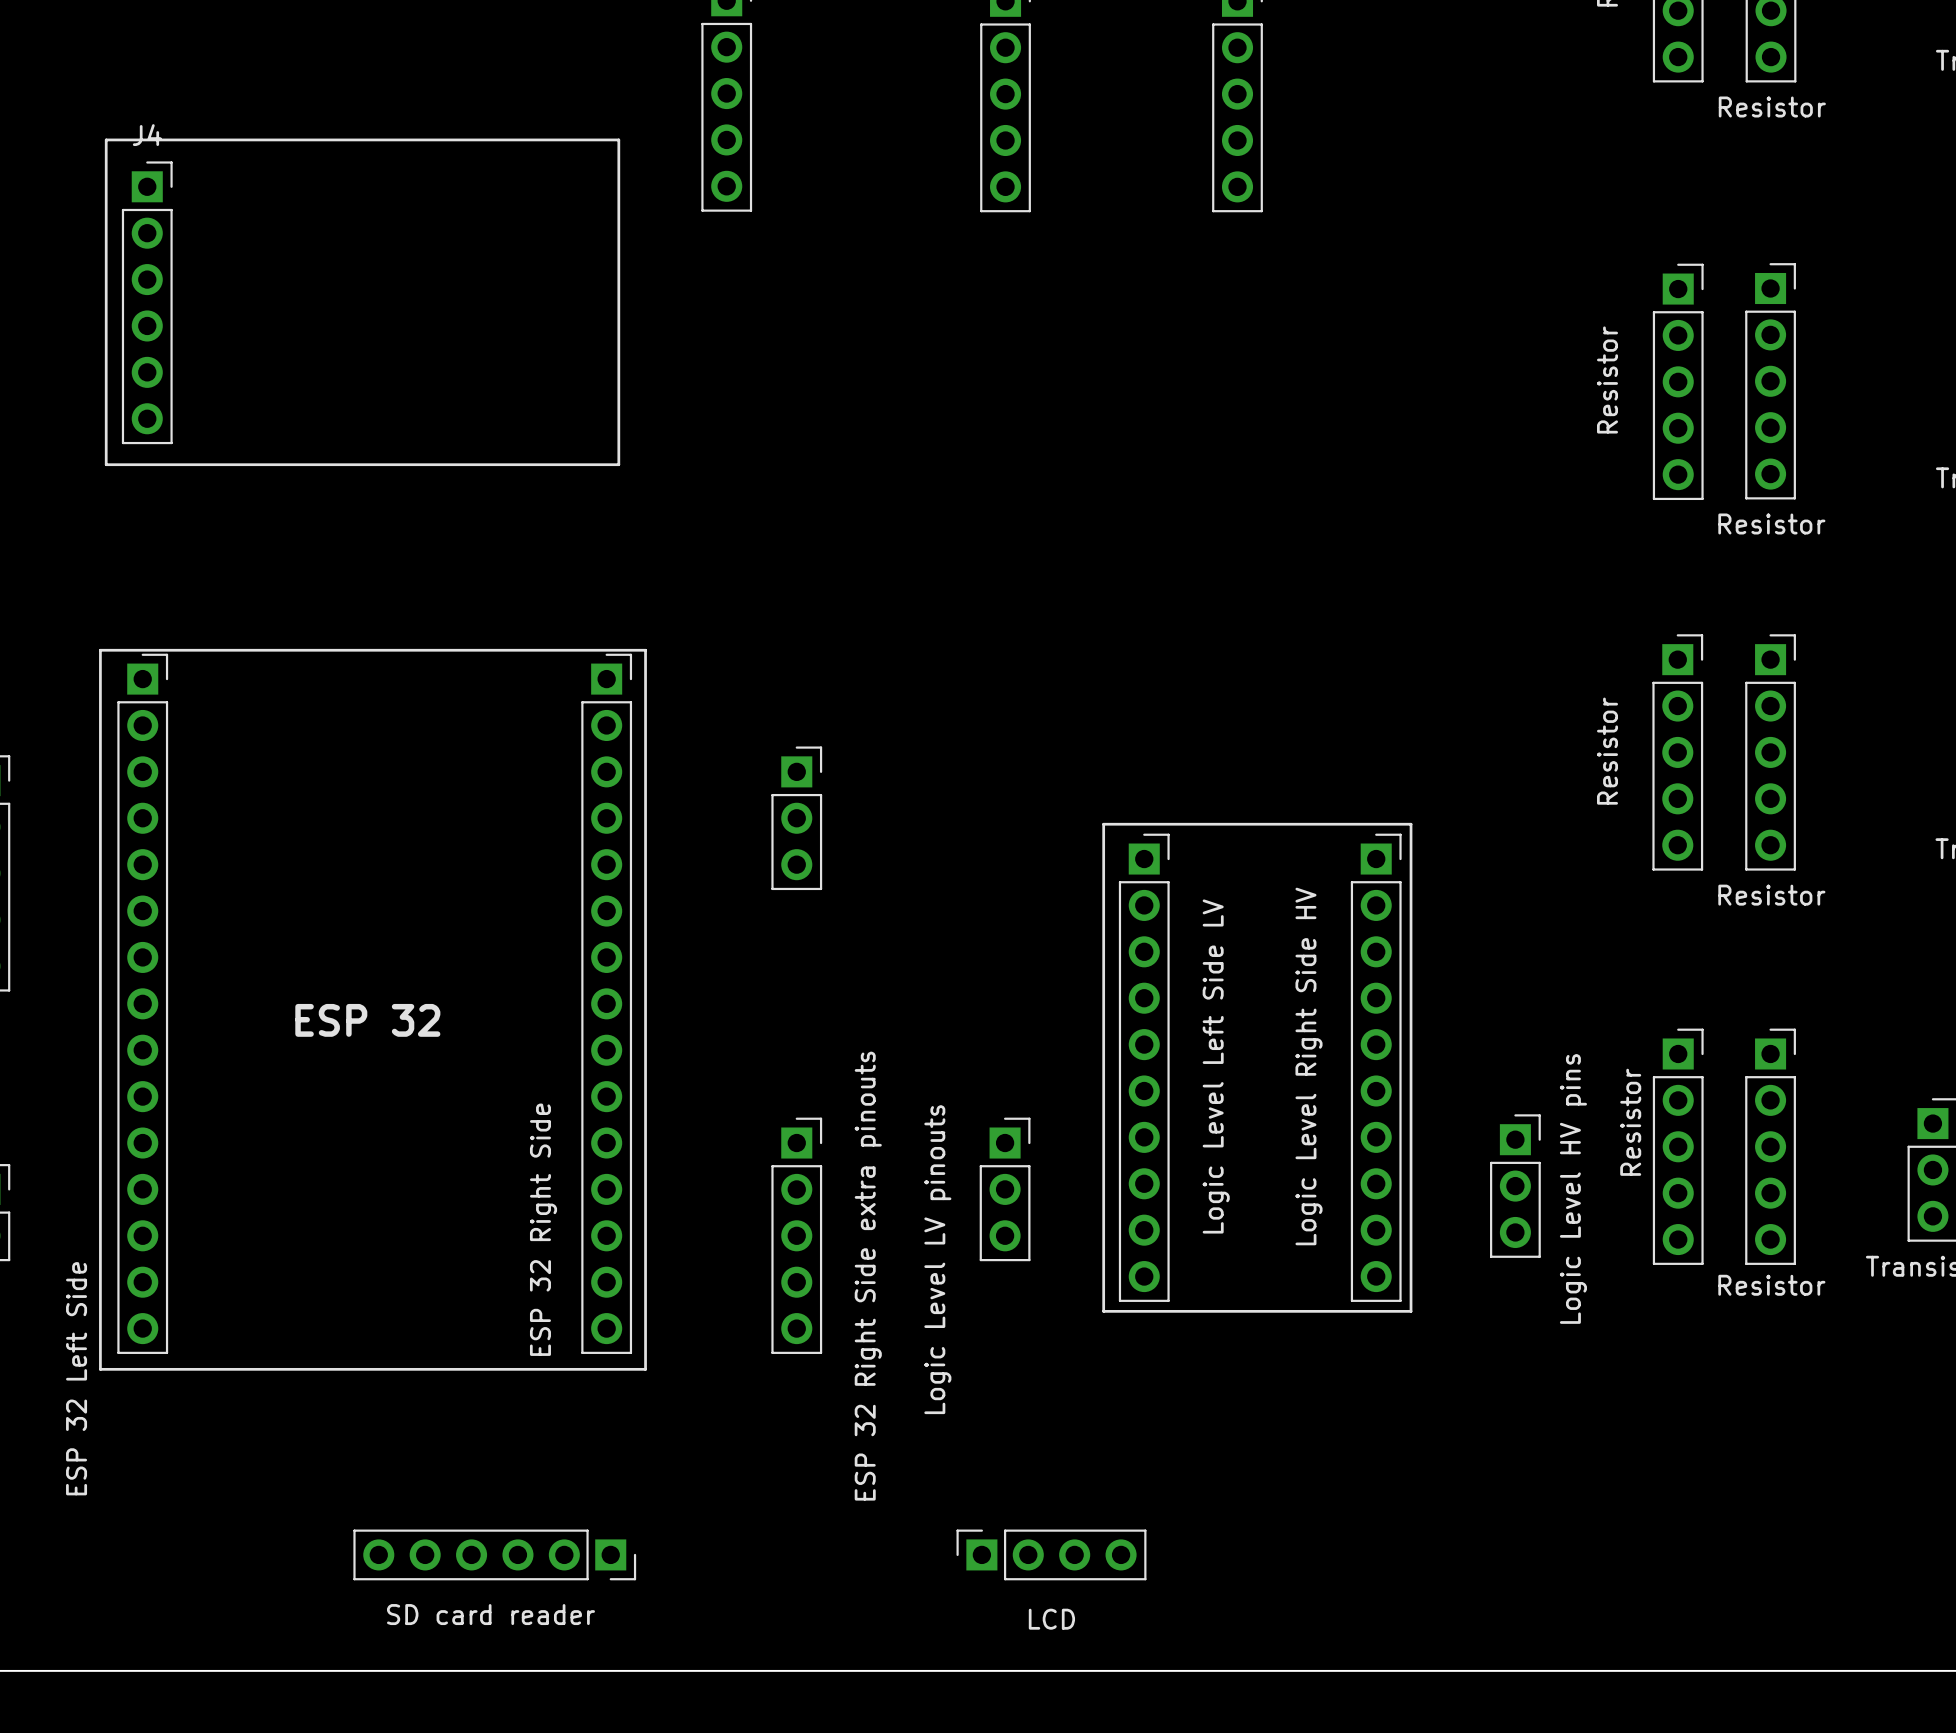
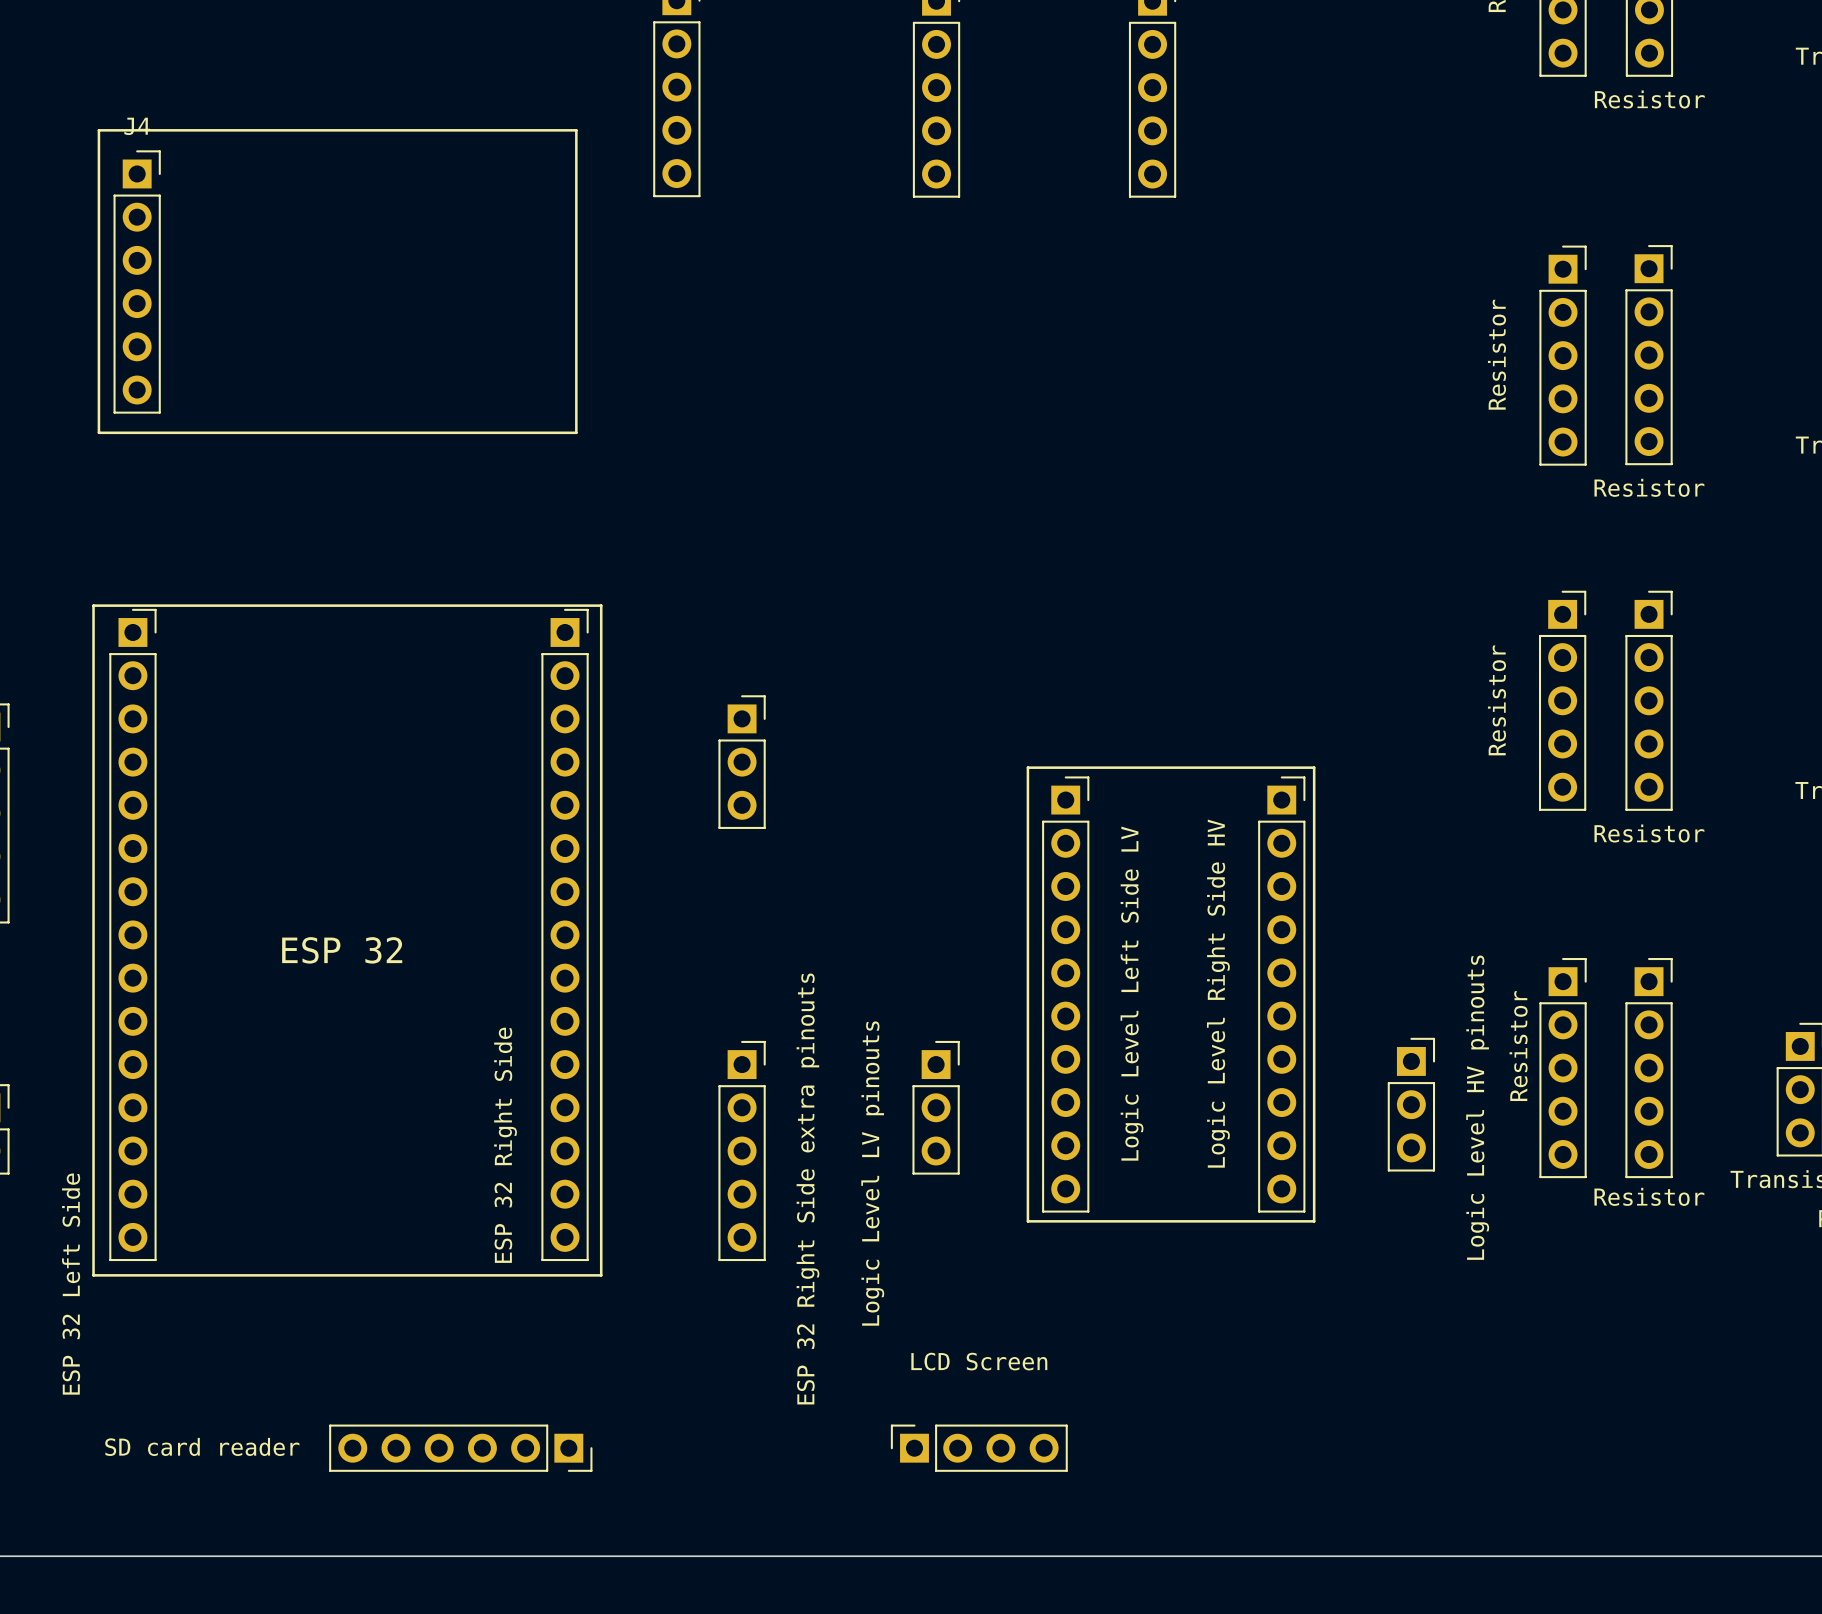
part value: Logic Level HV pins (1573, 1188) -> Logic Level HV pinouts (1477, 1107)
part value position: SD card reader (490, 1614) -> SD card reader (202, 1446)
part value: LCD (1051, 1619) -> LCD Screen (979, 1361)

